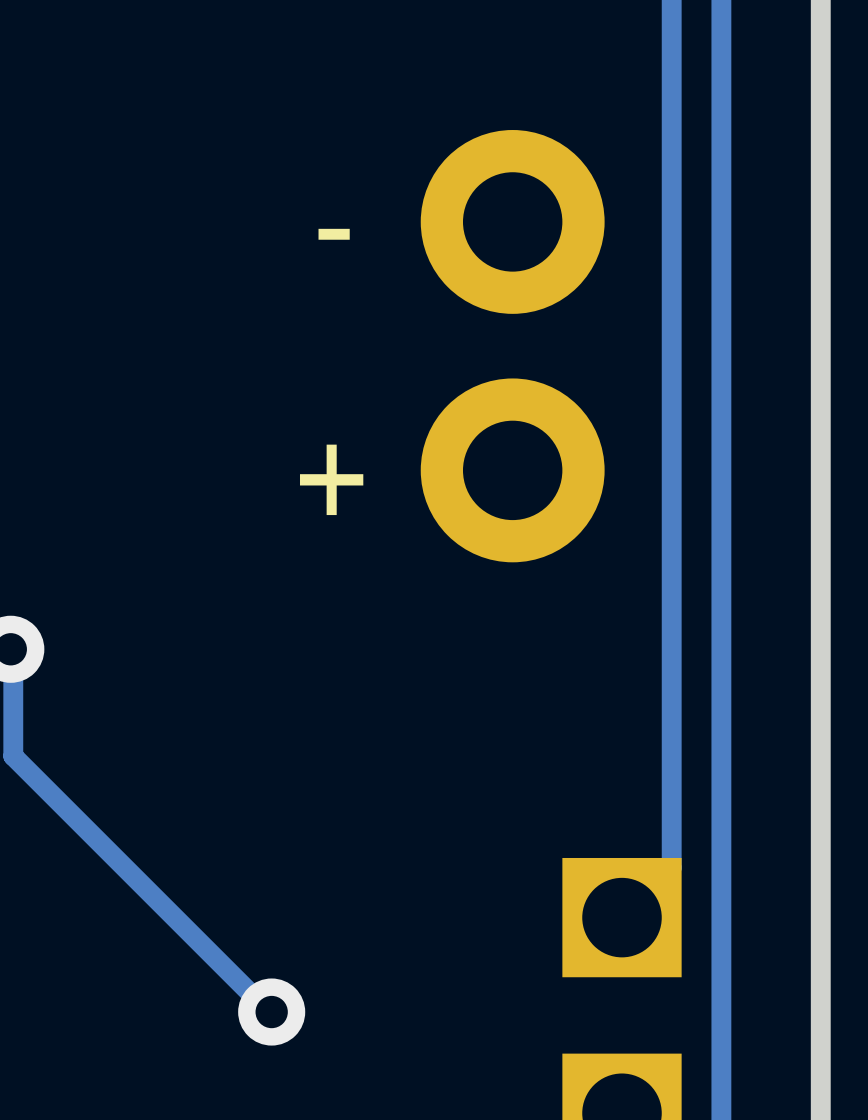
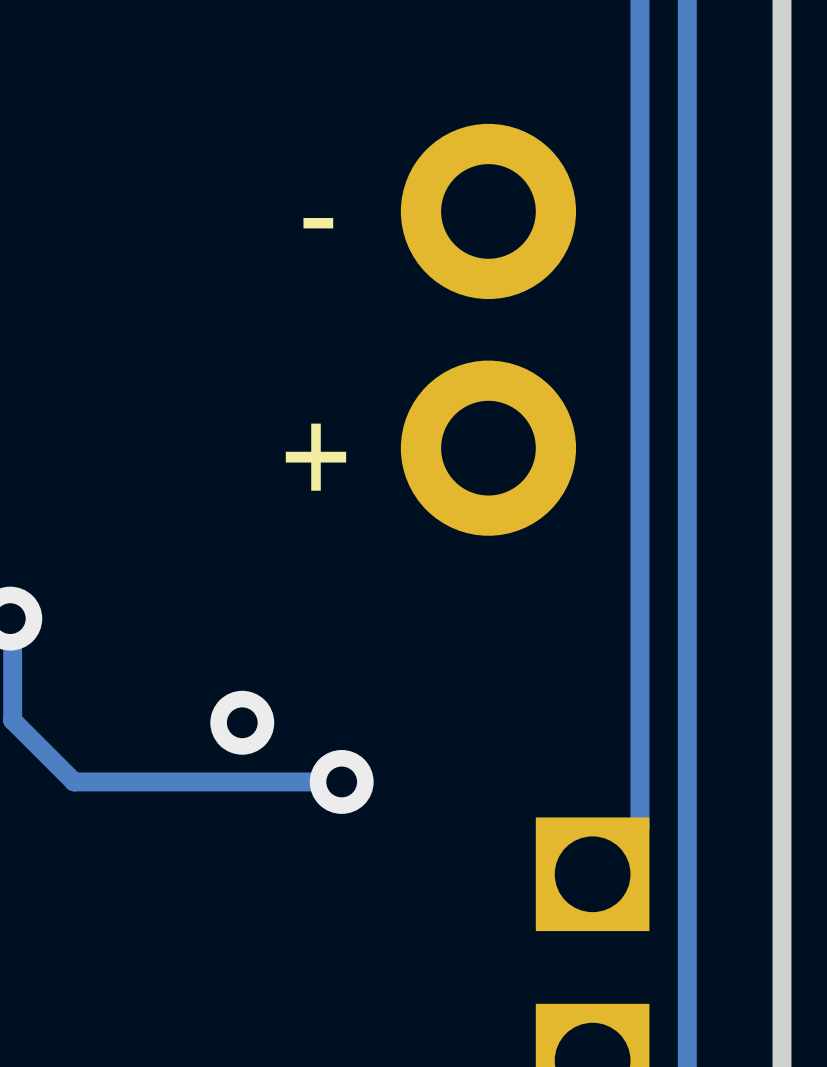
via: none -> (242, 722)
track: (77, 820) (269, 1012) (271, 1012) -> (74, 781) (341, 781)
via: none -> (341, 781)
via: (271, 1012) -> none

